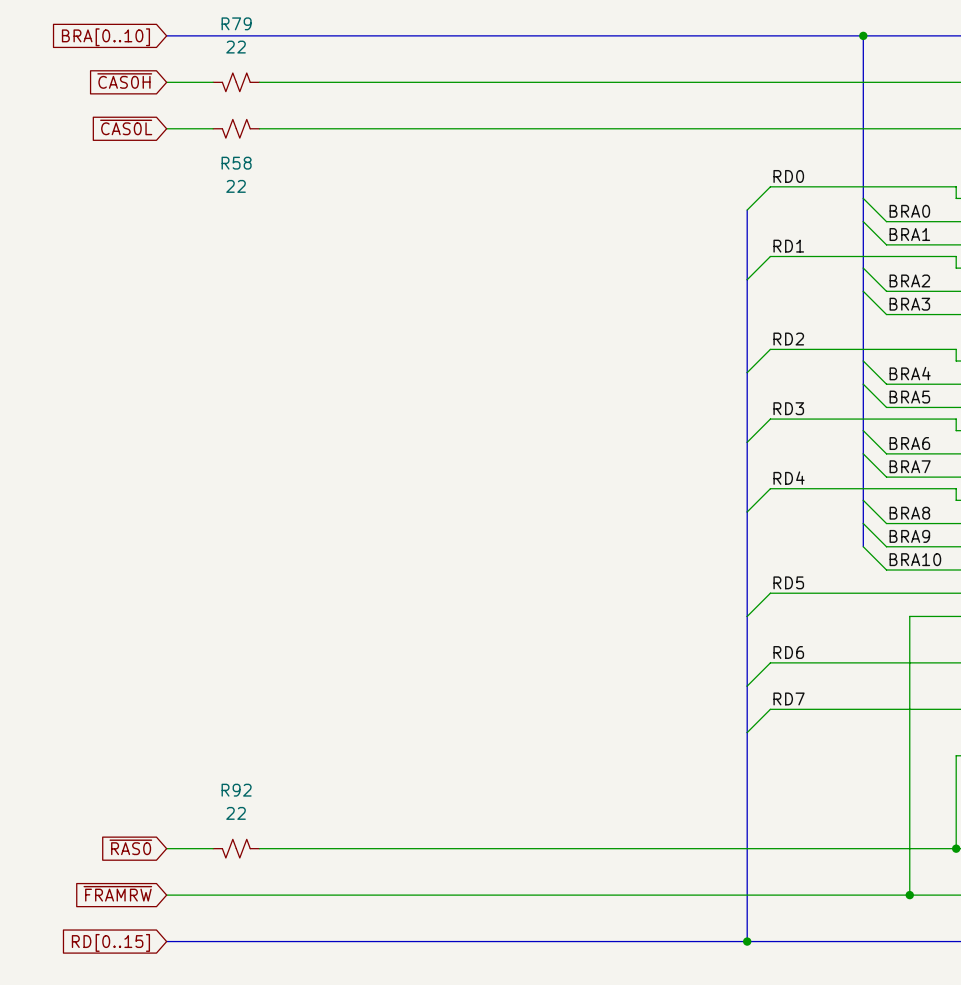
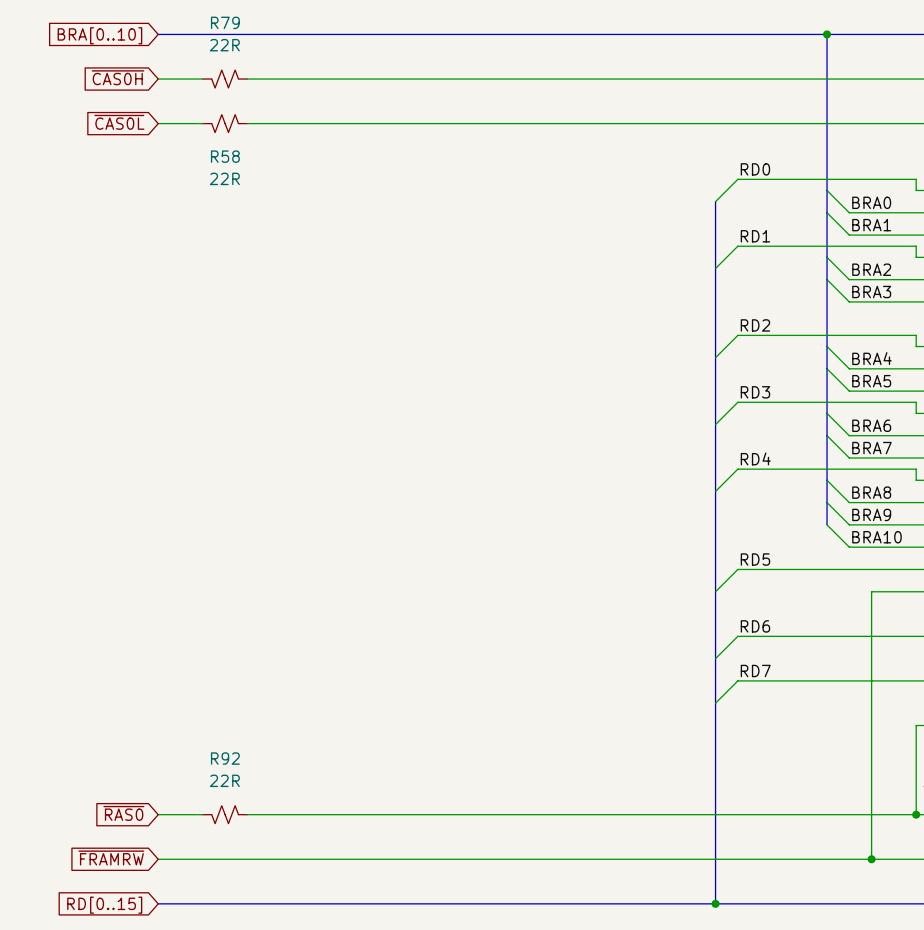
R79 value: 22 (236, 47) -> 22R (224, 45)
R58 value: 22 (236, 186) -> 22R (224, 178)
R92 value: 22 (236, 813) -> 22R (224, 780)

